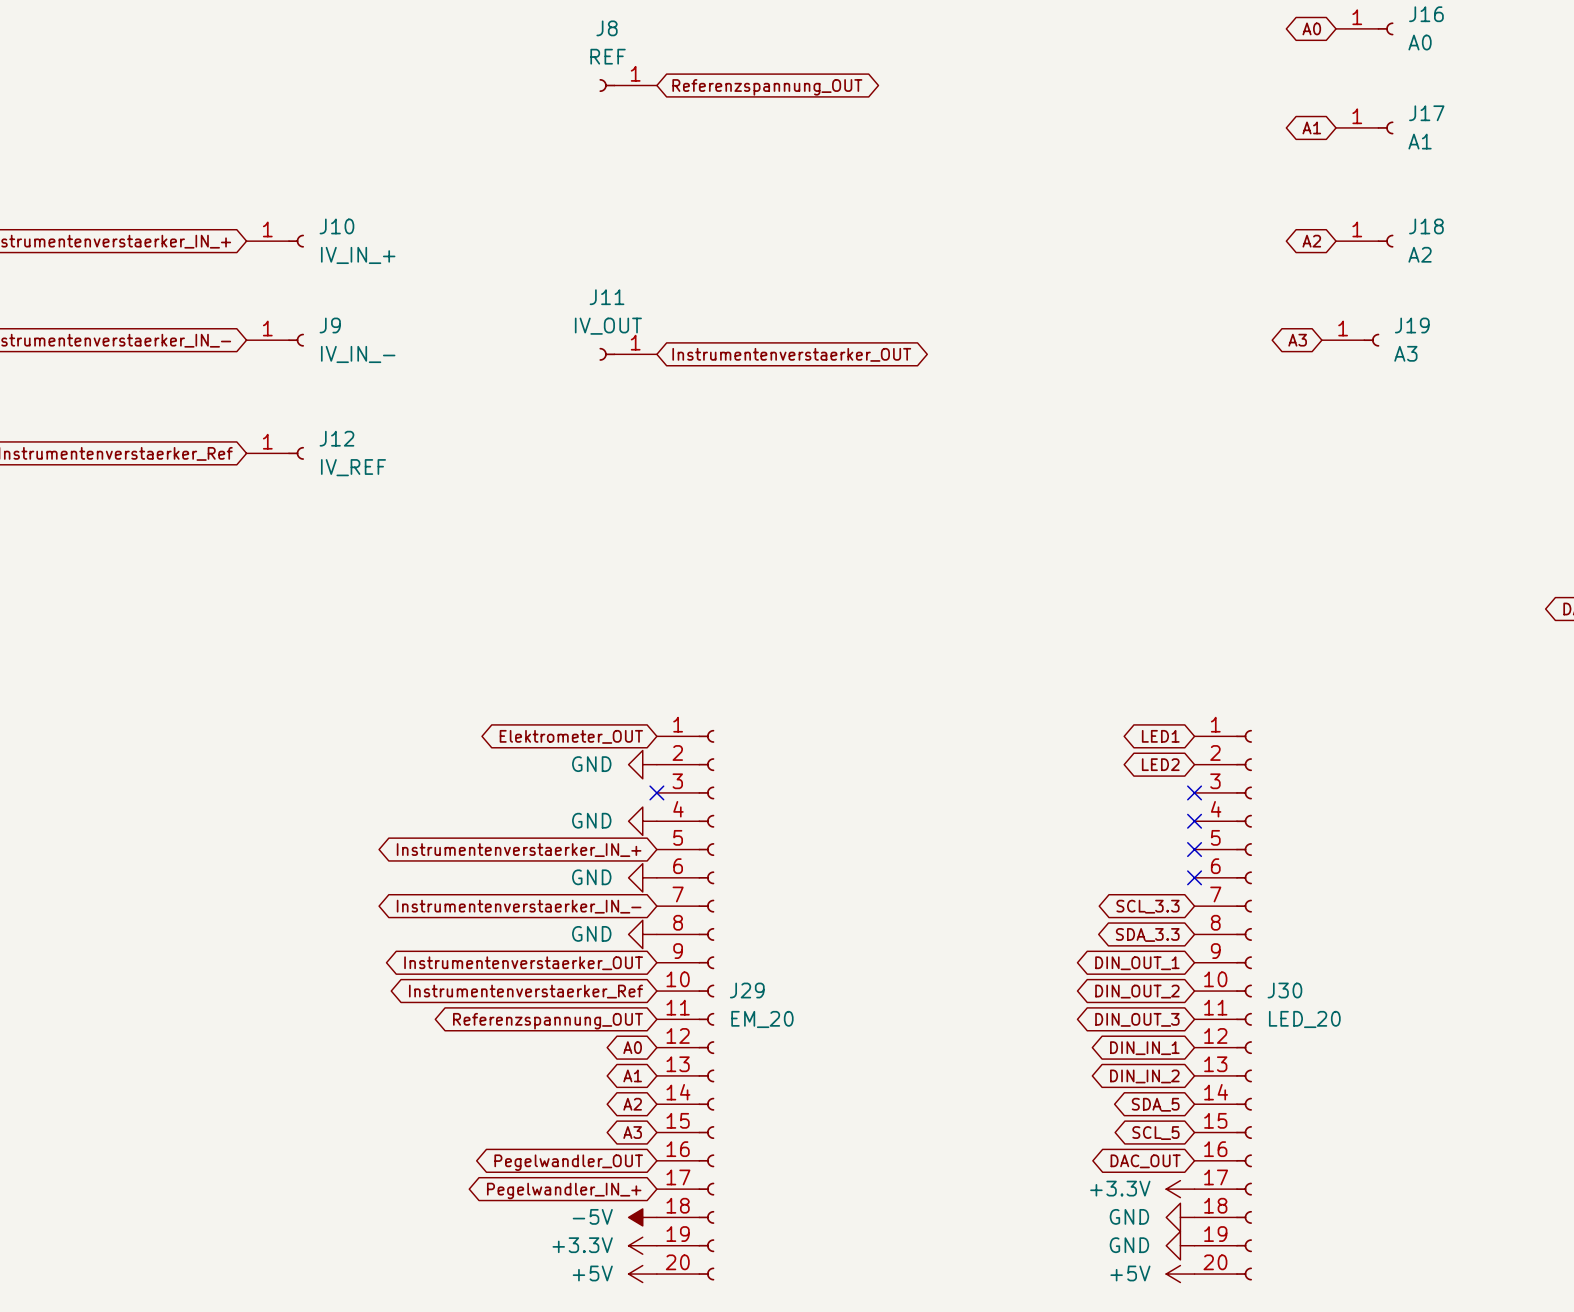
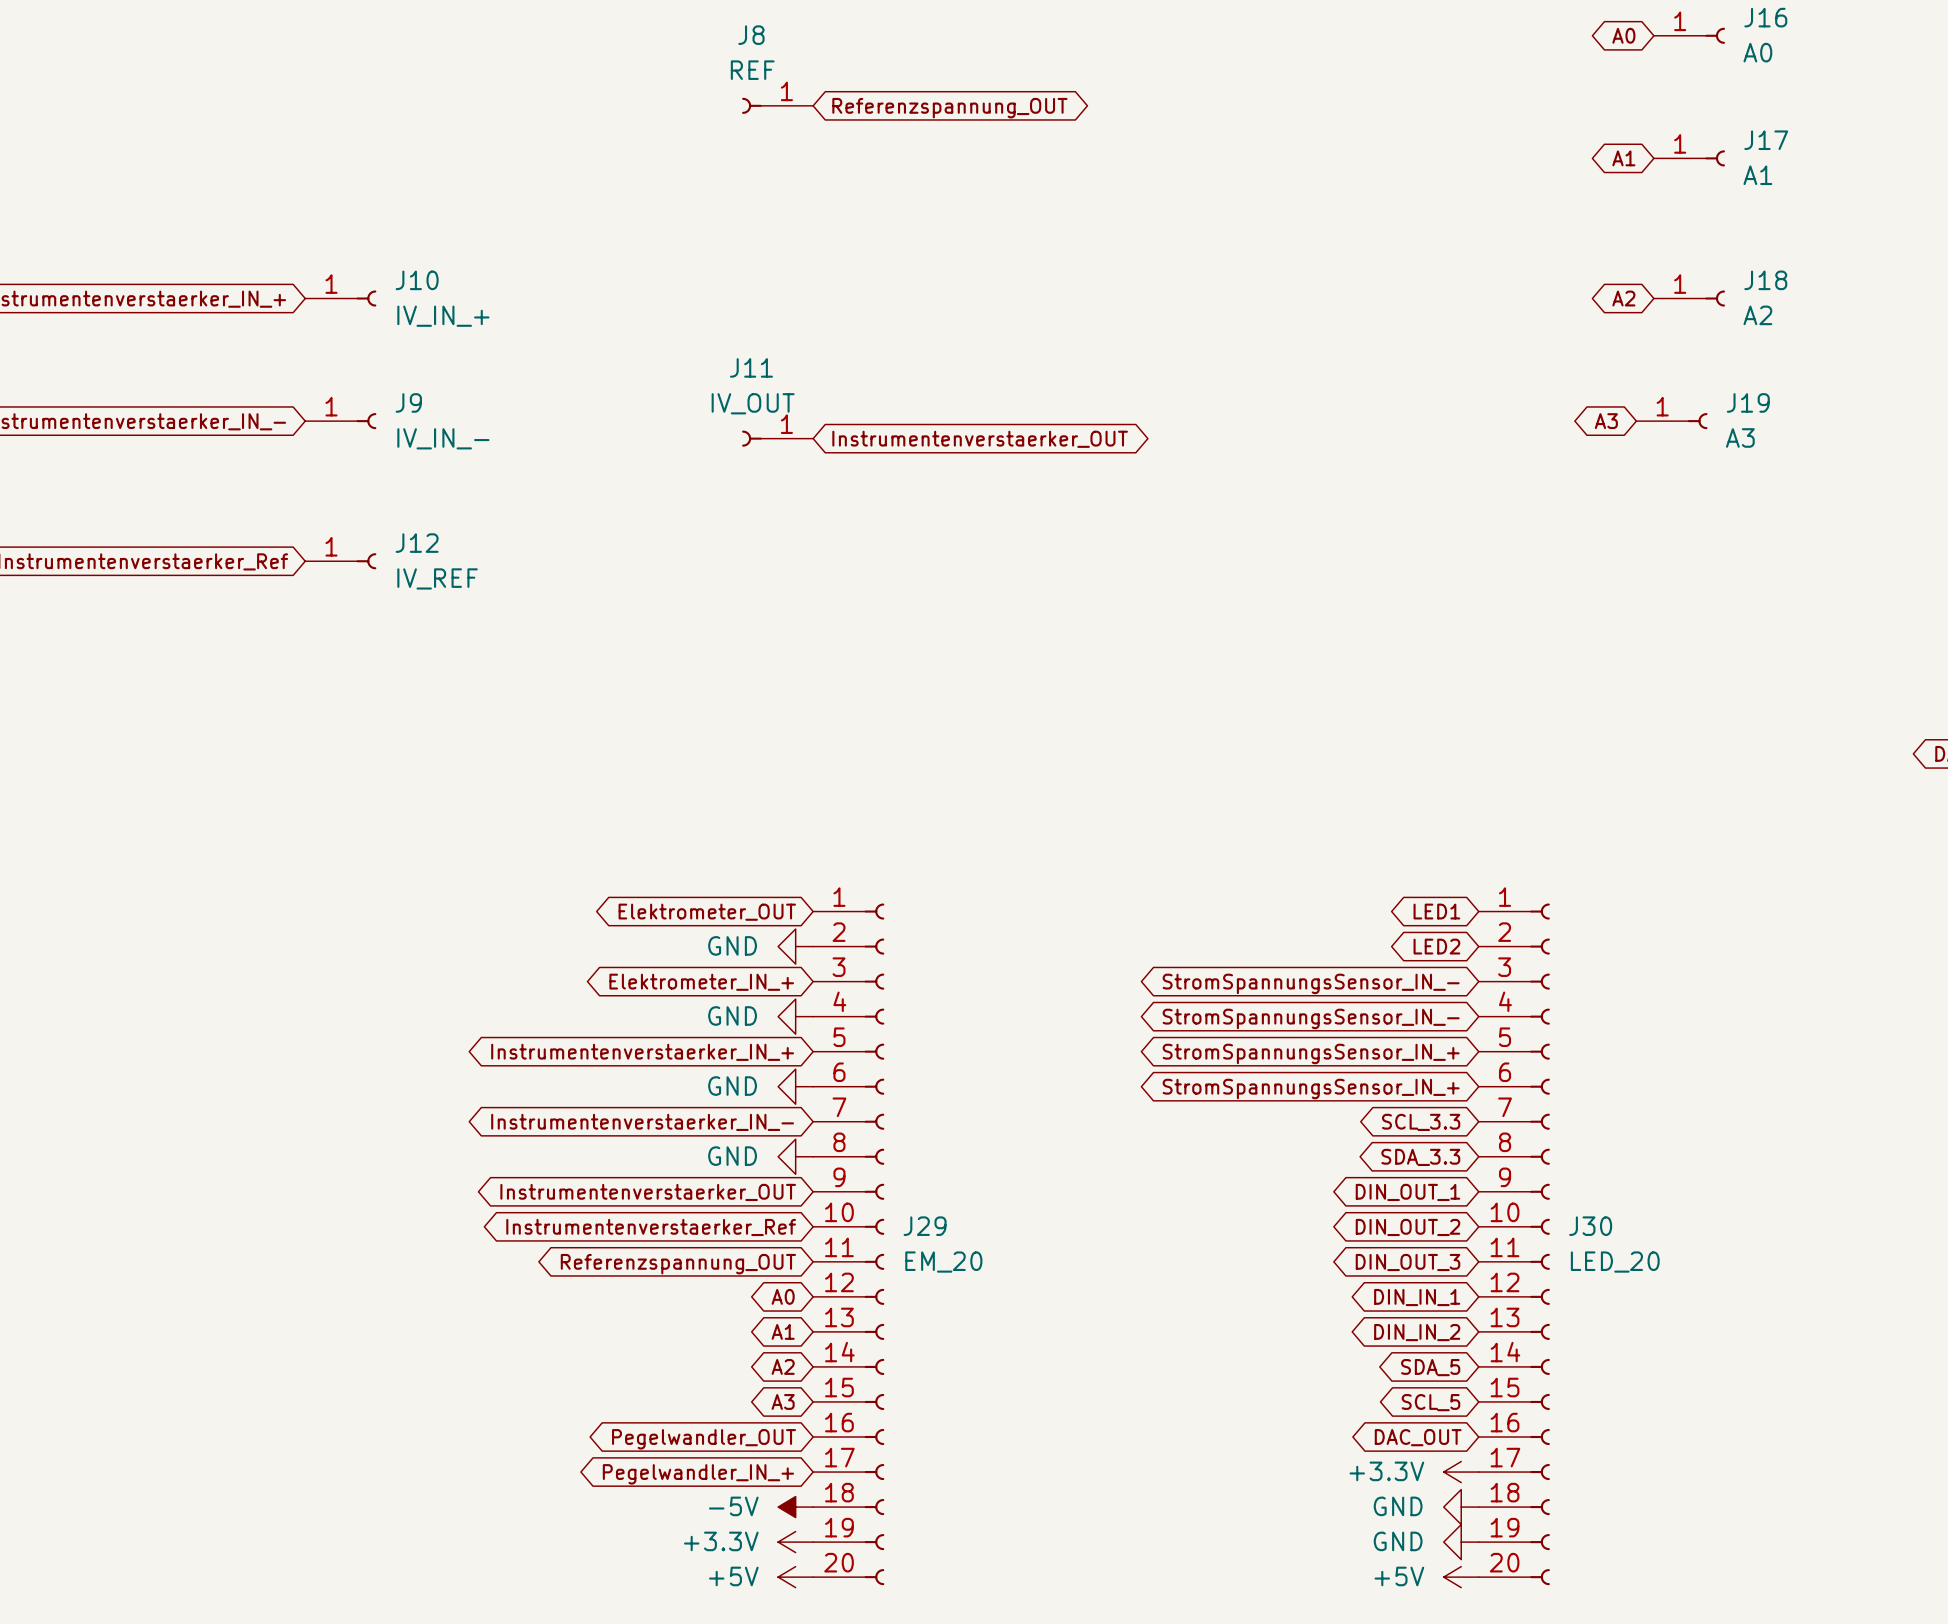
no-connect mark: (656, 792) -> none
no-connect mark: (1194, 792) -> none
global label: none -> Elektrometer_IN_+ (701, 982)
global label: none -> StromSpannungsSensor_IN_- (1311, 983)
no-connect mark: (1194, 821) -> none
global label: none -> StromSpannungsSensor_IN_- (1311, 1018)
no-connect mark: (1194, 849) -> none
global label: none -> StromSpannungsSensor_IN_+ (1311, 1053)
no-connect mark: (1194, 877) -> none
global label: none -> StromSpannungsSensor_IN_+ (1311, 1088)

